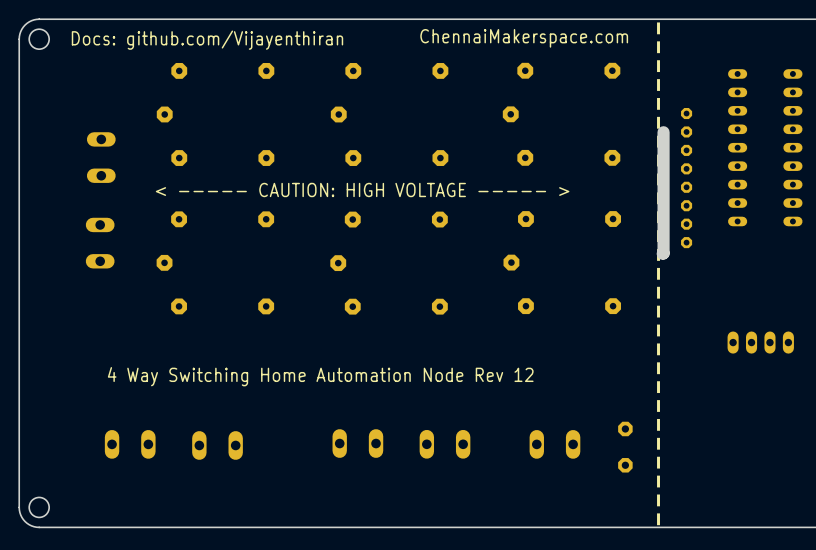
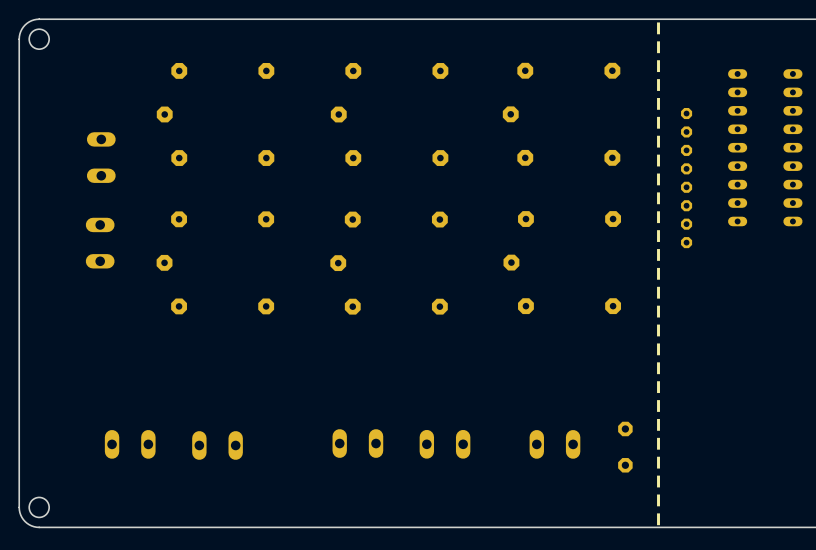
text: ChennaiMakerspace.com (524, 38) -> none
text: Docs: github.com/Vijayenthiran (207, 40) -> none
board edge: (663, 132) (662, 253) -> none
text: < ----- CAUTION: HIGH VOLTAGE ----- > (362, 189) -> none
part: (760, 342) -> none
text: 4 Way Switching Home Automation Node Rev 12 (320, 376) -> none

